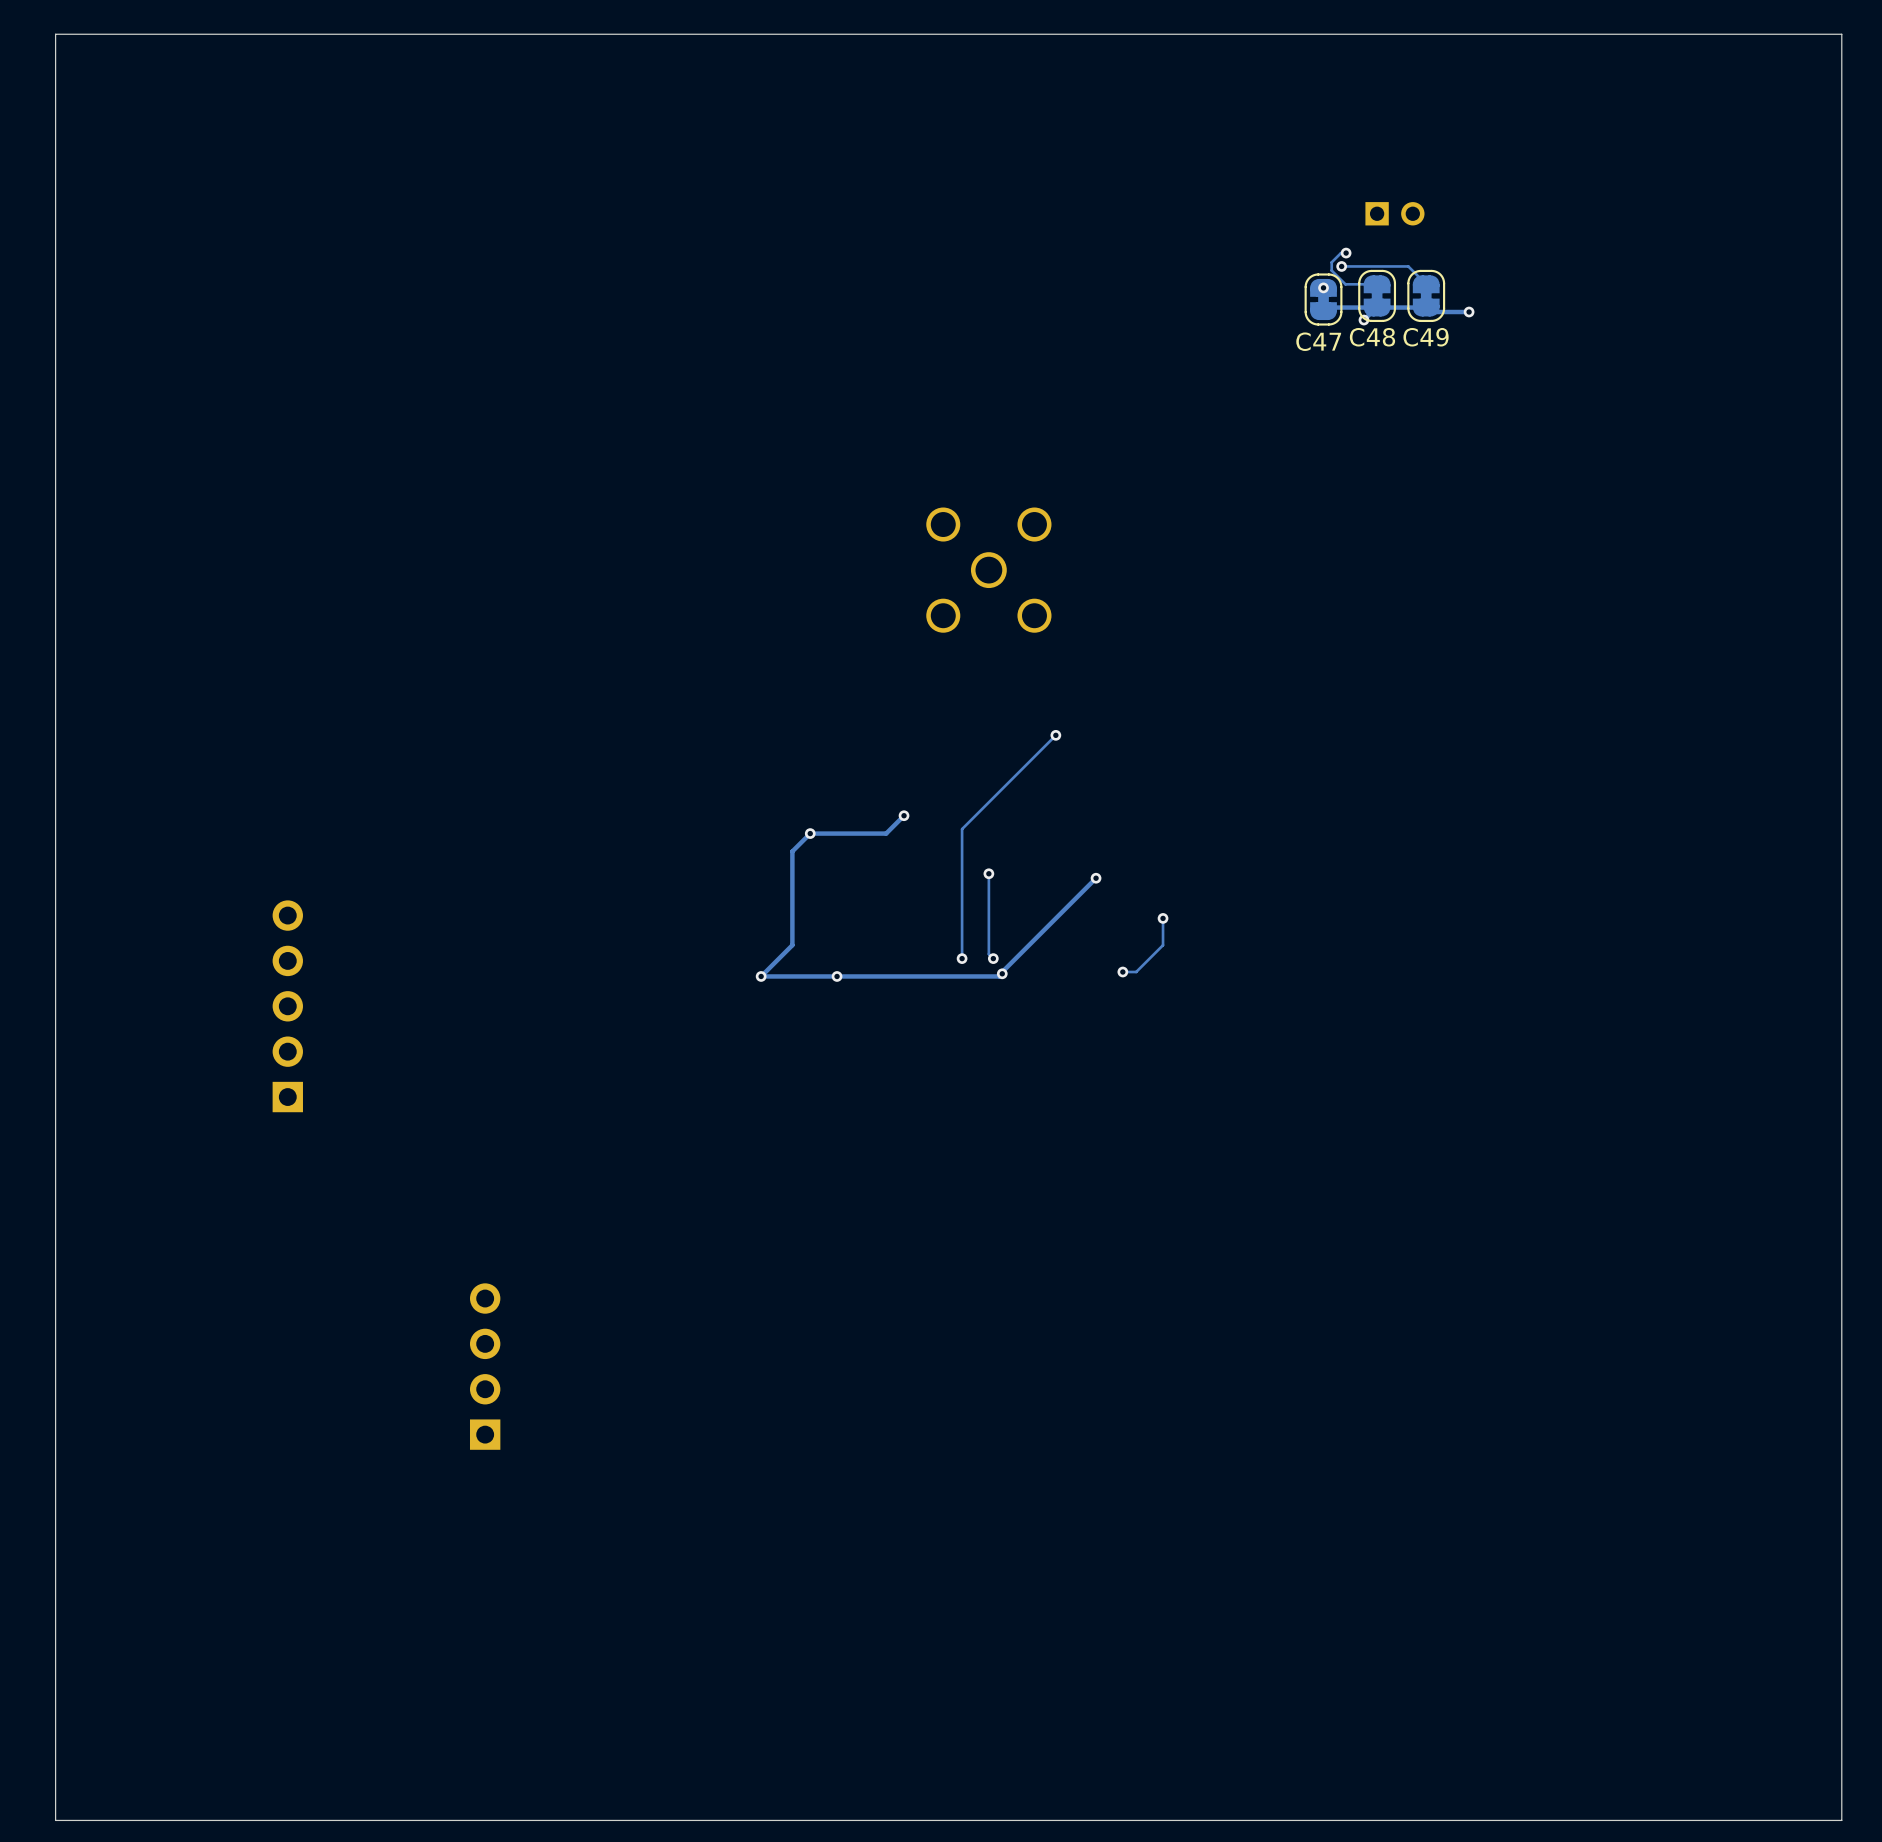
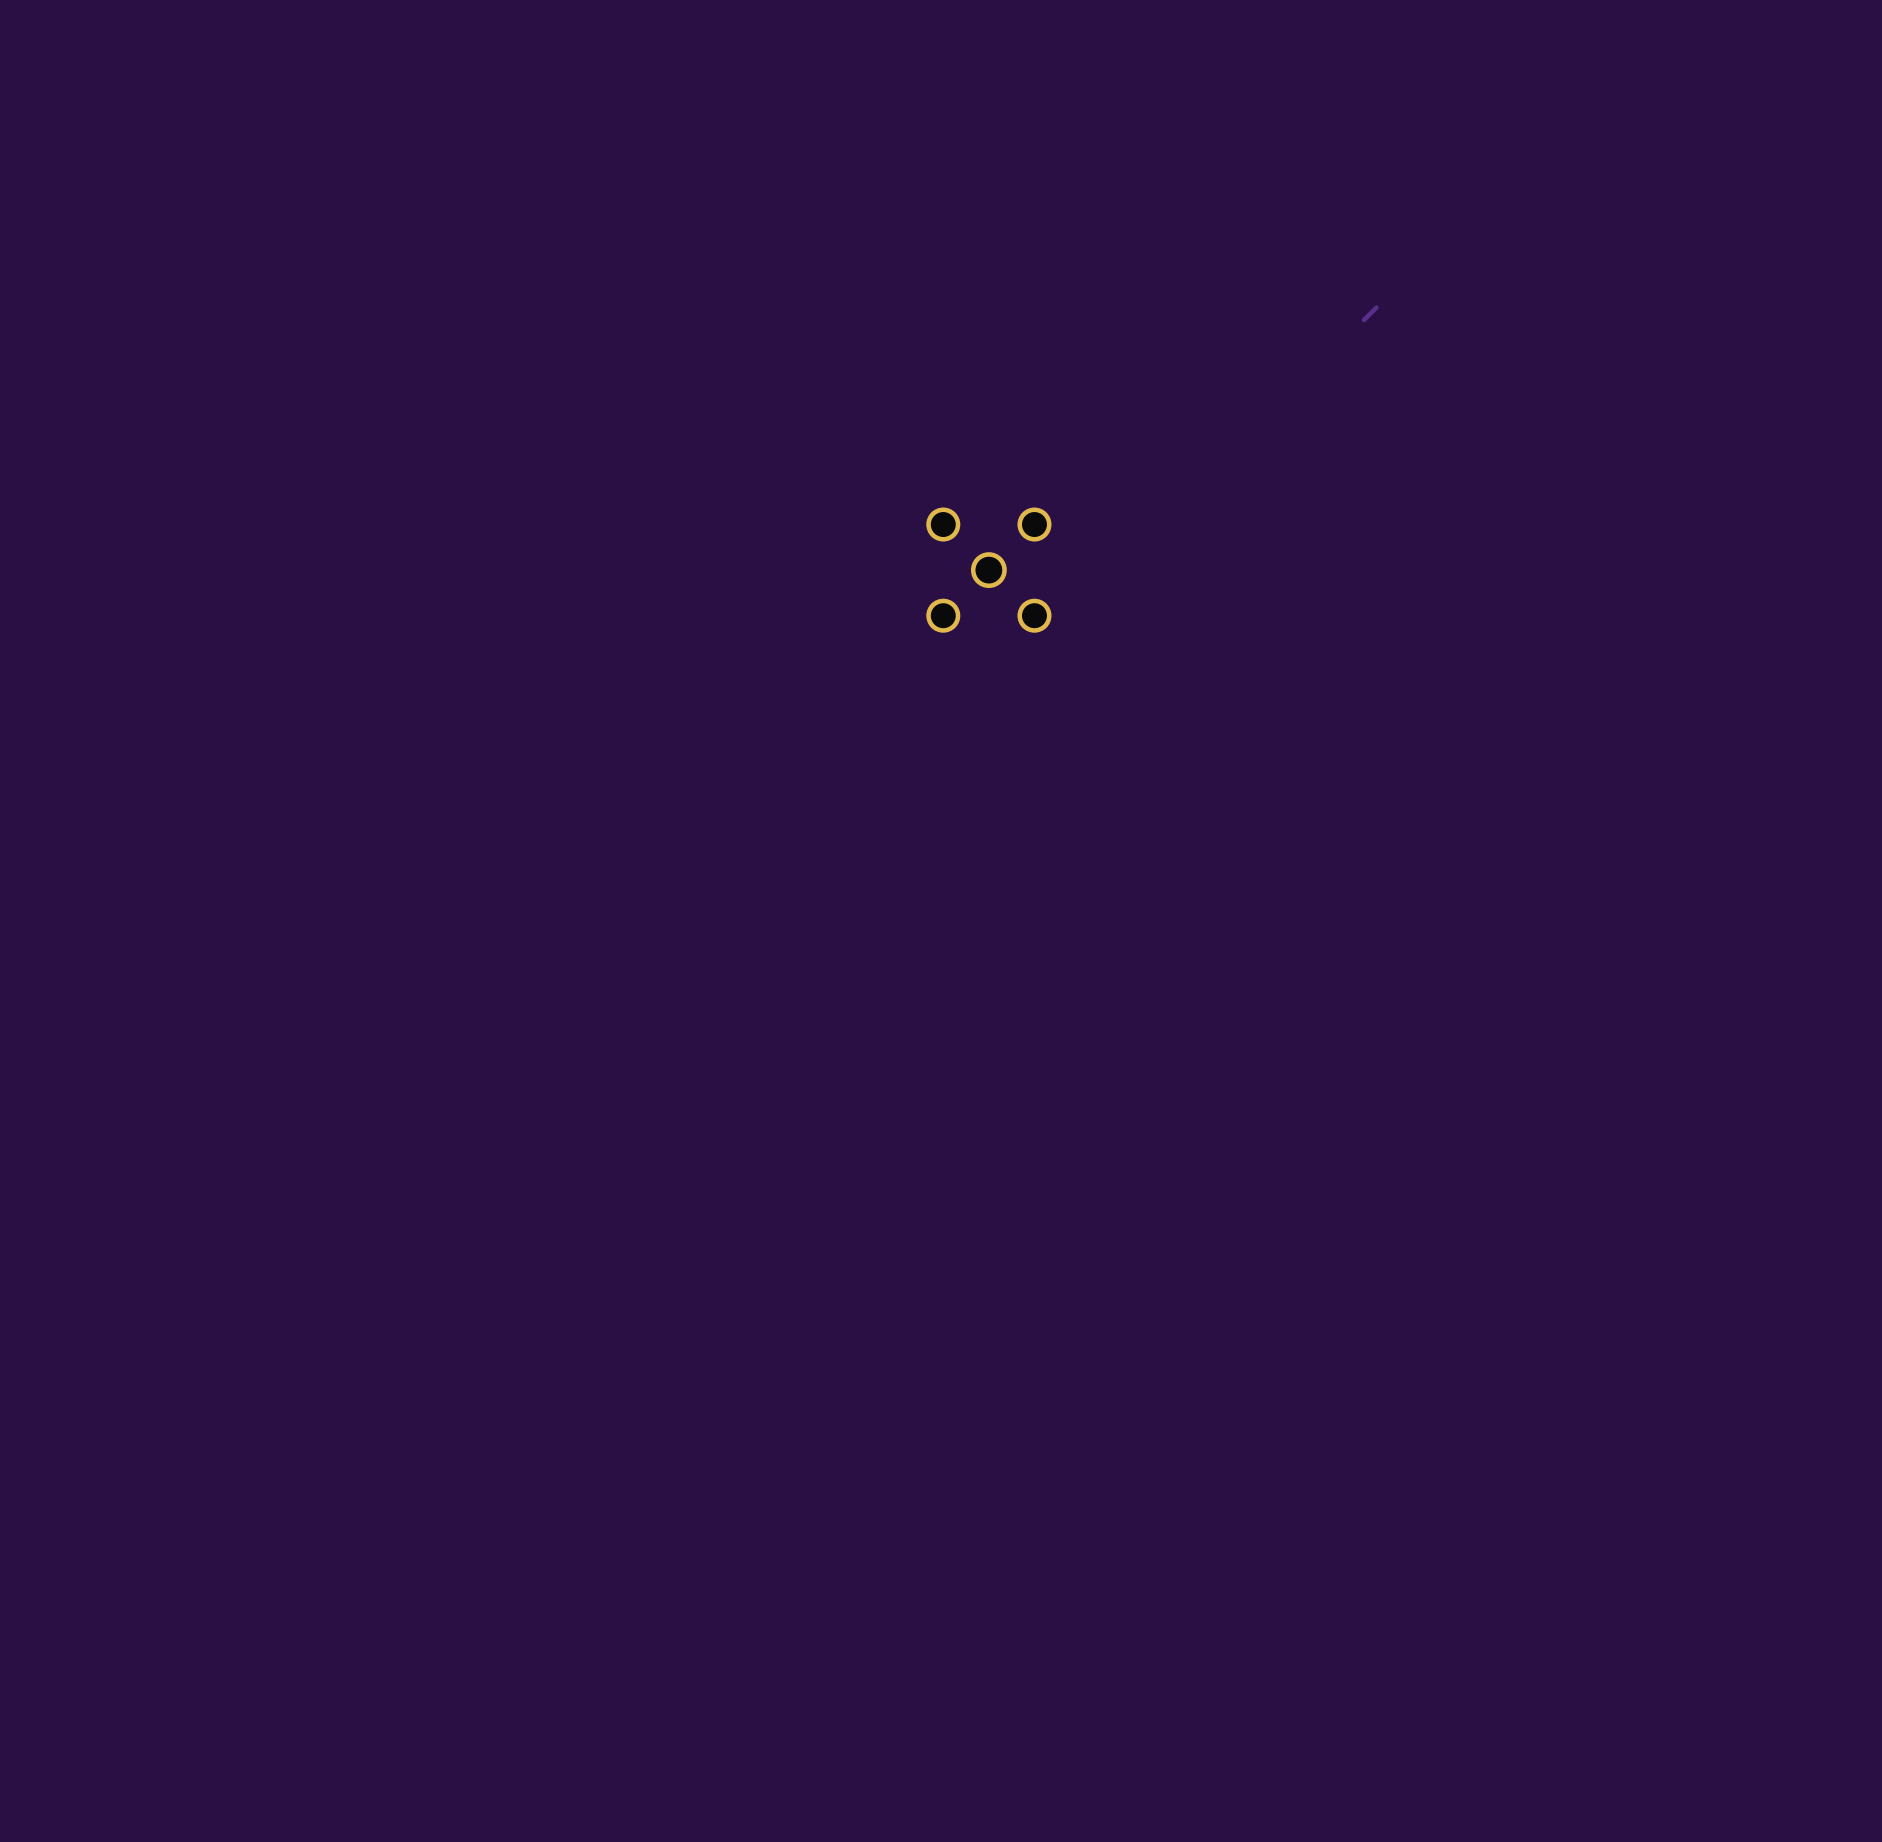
board edge: (1841, 34) (55, 34) (55, 1820) (1841, 1820) (1841, 34) -> none
part: (1394, 213) -> none
track: (1346, 253) (1341, 253) (1331, 262) (1331, 270) (1345, 284) (1377, 284) -> none
via: (1346, 253) -> none
track: (1341, 266) (1408, 266) (1426, 284) -> none
via: (1341, 266) -> none
via: (1323, 287) -> none
C48: (1377, 295) -> none
C49: (1426, 295) -> none
C47: (1323, 299) -> none
track: (1323, 311) (1327, 307) (1426, 307) (1430, 312) (1469, 312) -> none
via: (1469, 312) -> none
via: (1363, 320) -> none
track: (1055, 735) (962, 829) (962, 958) -> none
via: (1055, 735) -> none
track: (904, 815) (886, 833) (810, 833) (792, 851) (792, 945) (761, 976) (999, 976) (1096, 878) -> none
via: (904, 815) -> none
via: (810, 833) -> none
track: (988, 873) (988, 954) (993, 958) -> none
via: (988, 873) -> none
via: (1096, 878) -> none
track: (1163, 918) (1163, 945) (1136, 972) (1122, 972) -> none
via: (1163, 918) -> none
via: (962, 958) -> none
via: (993, 958) -> none
via: (1122, 972) -> none
via: (1002, 973) -> none
via: (761, 976) -> none
via: (837, 976) -> none
part: (287, 1006) -> none
part: (485, 1366) -> none

